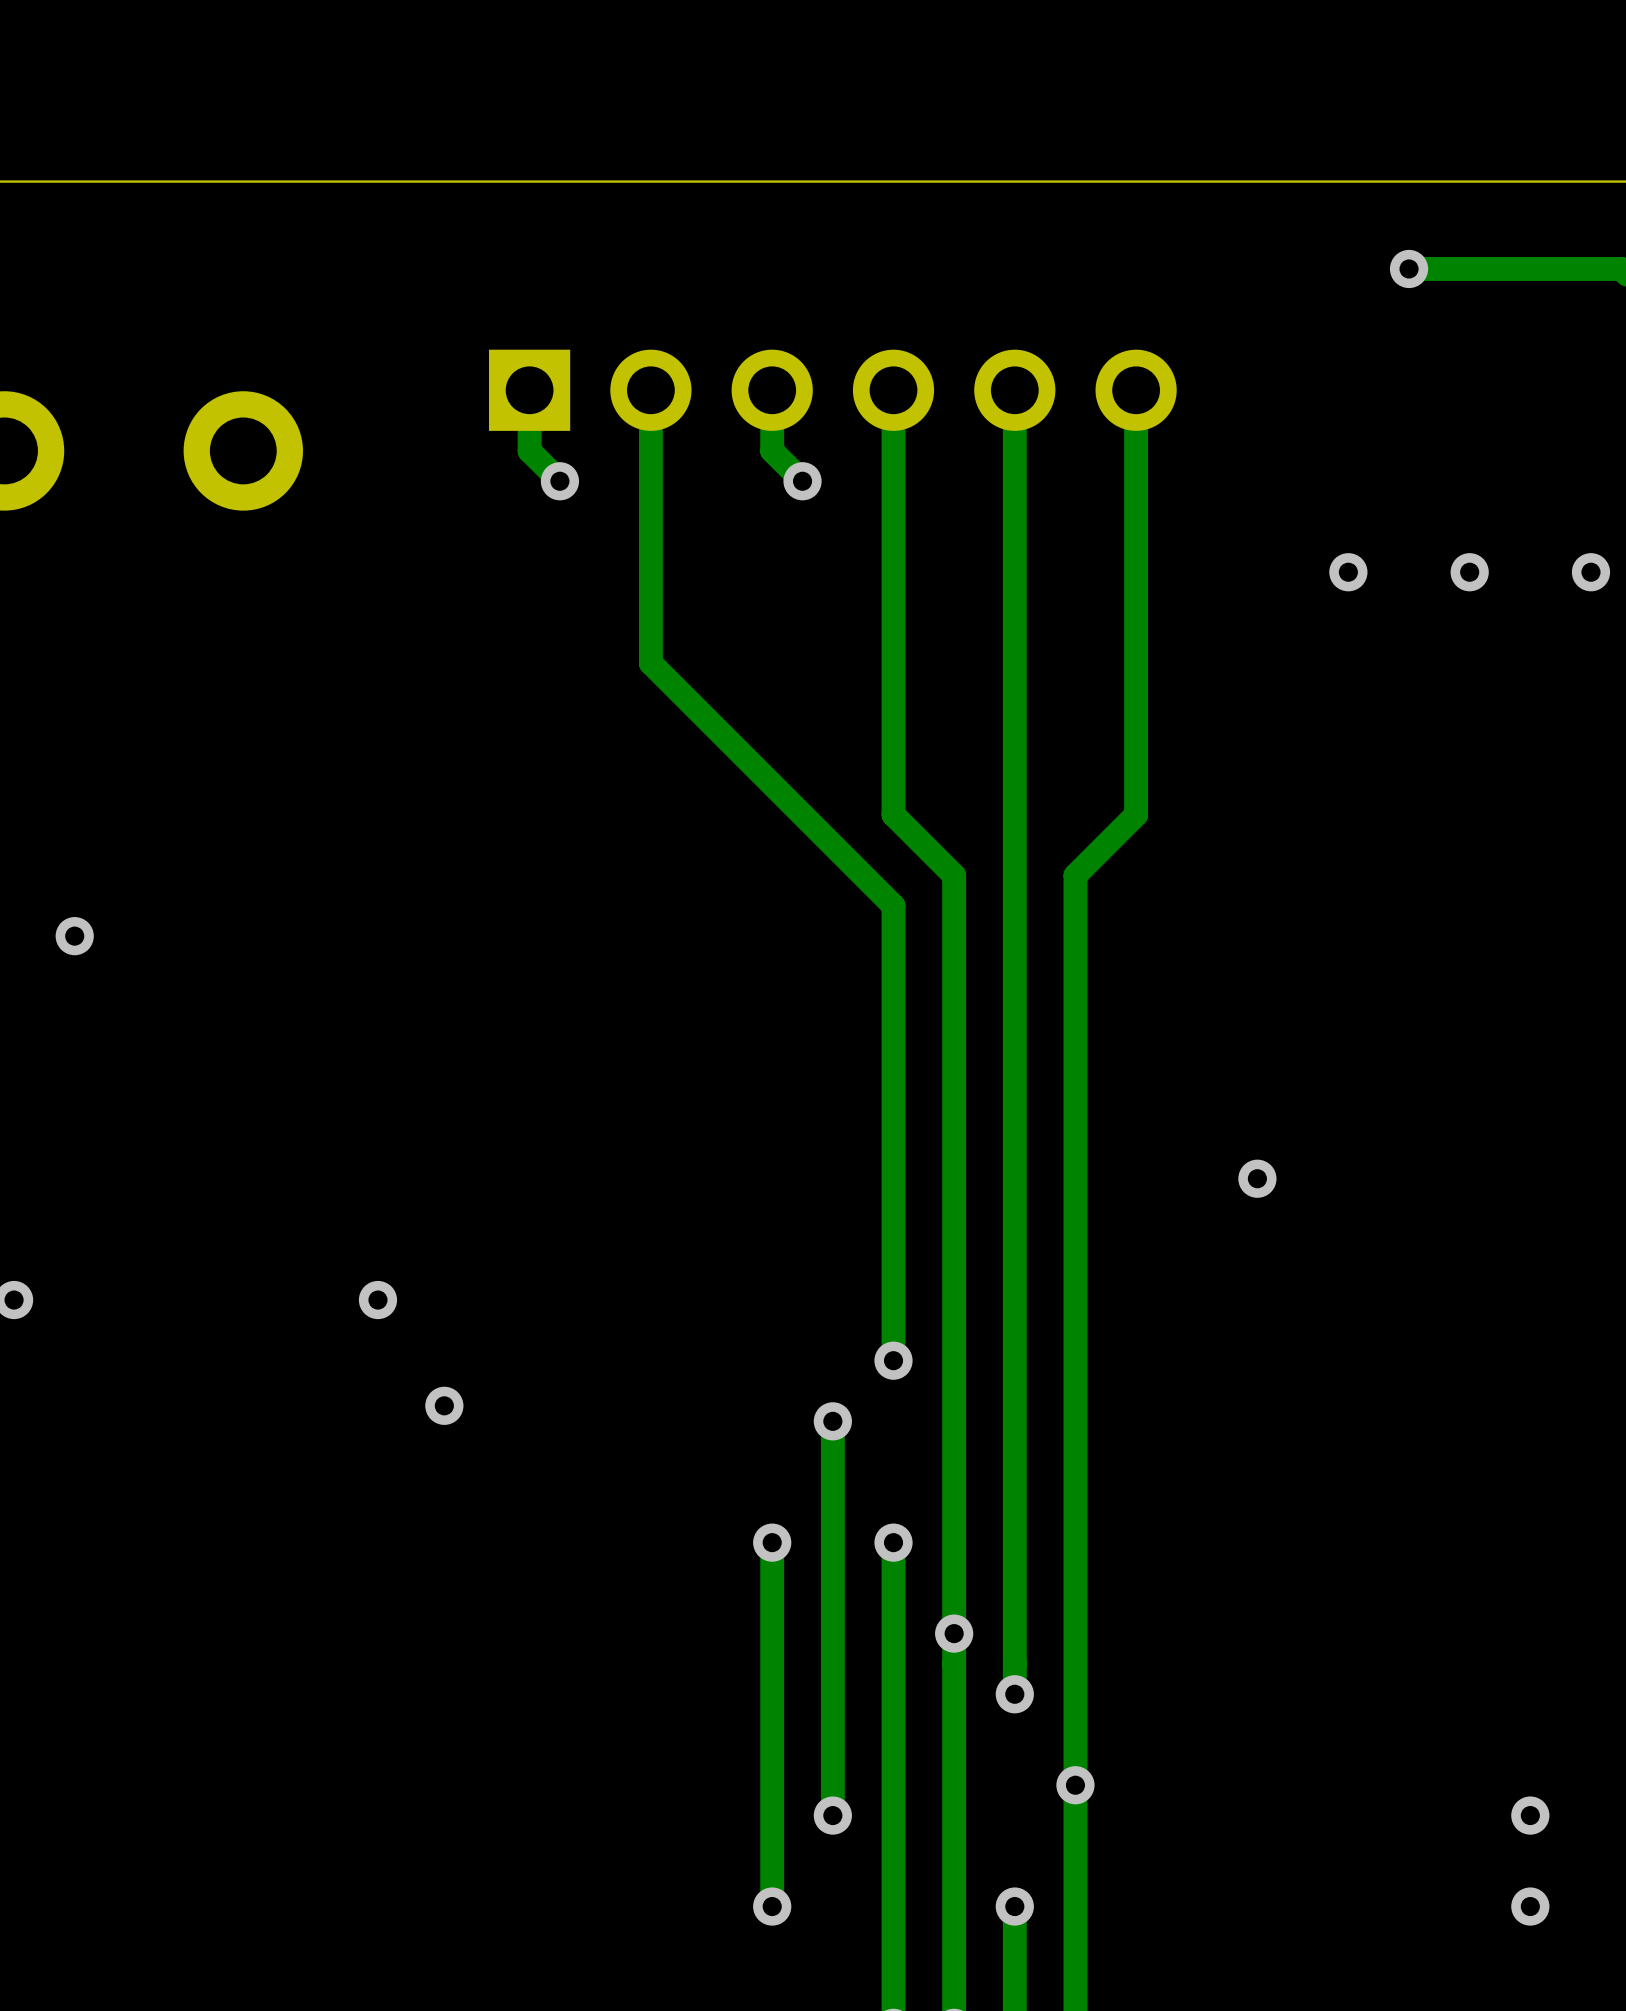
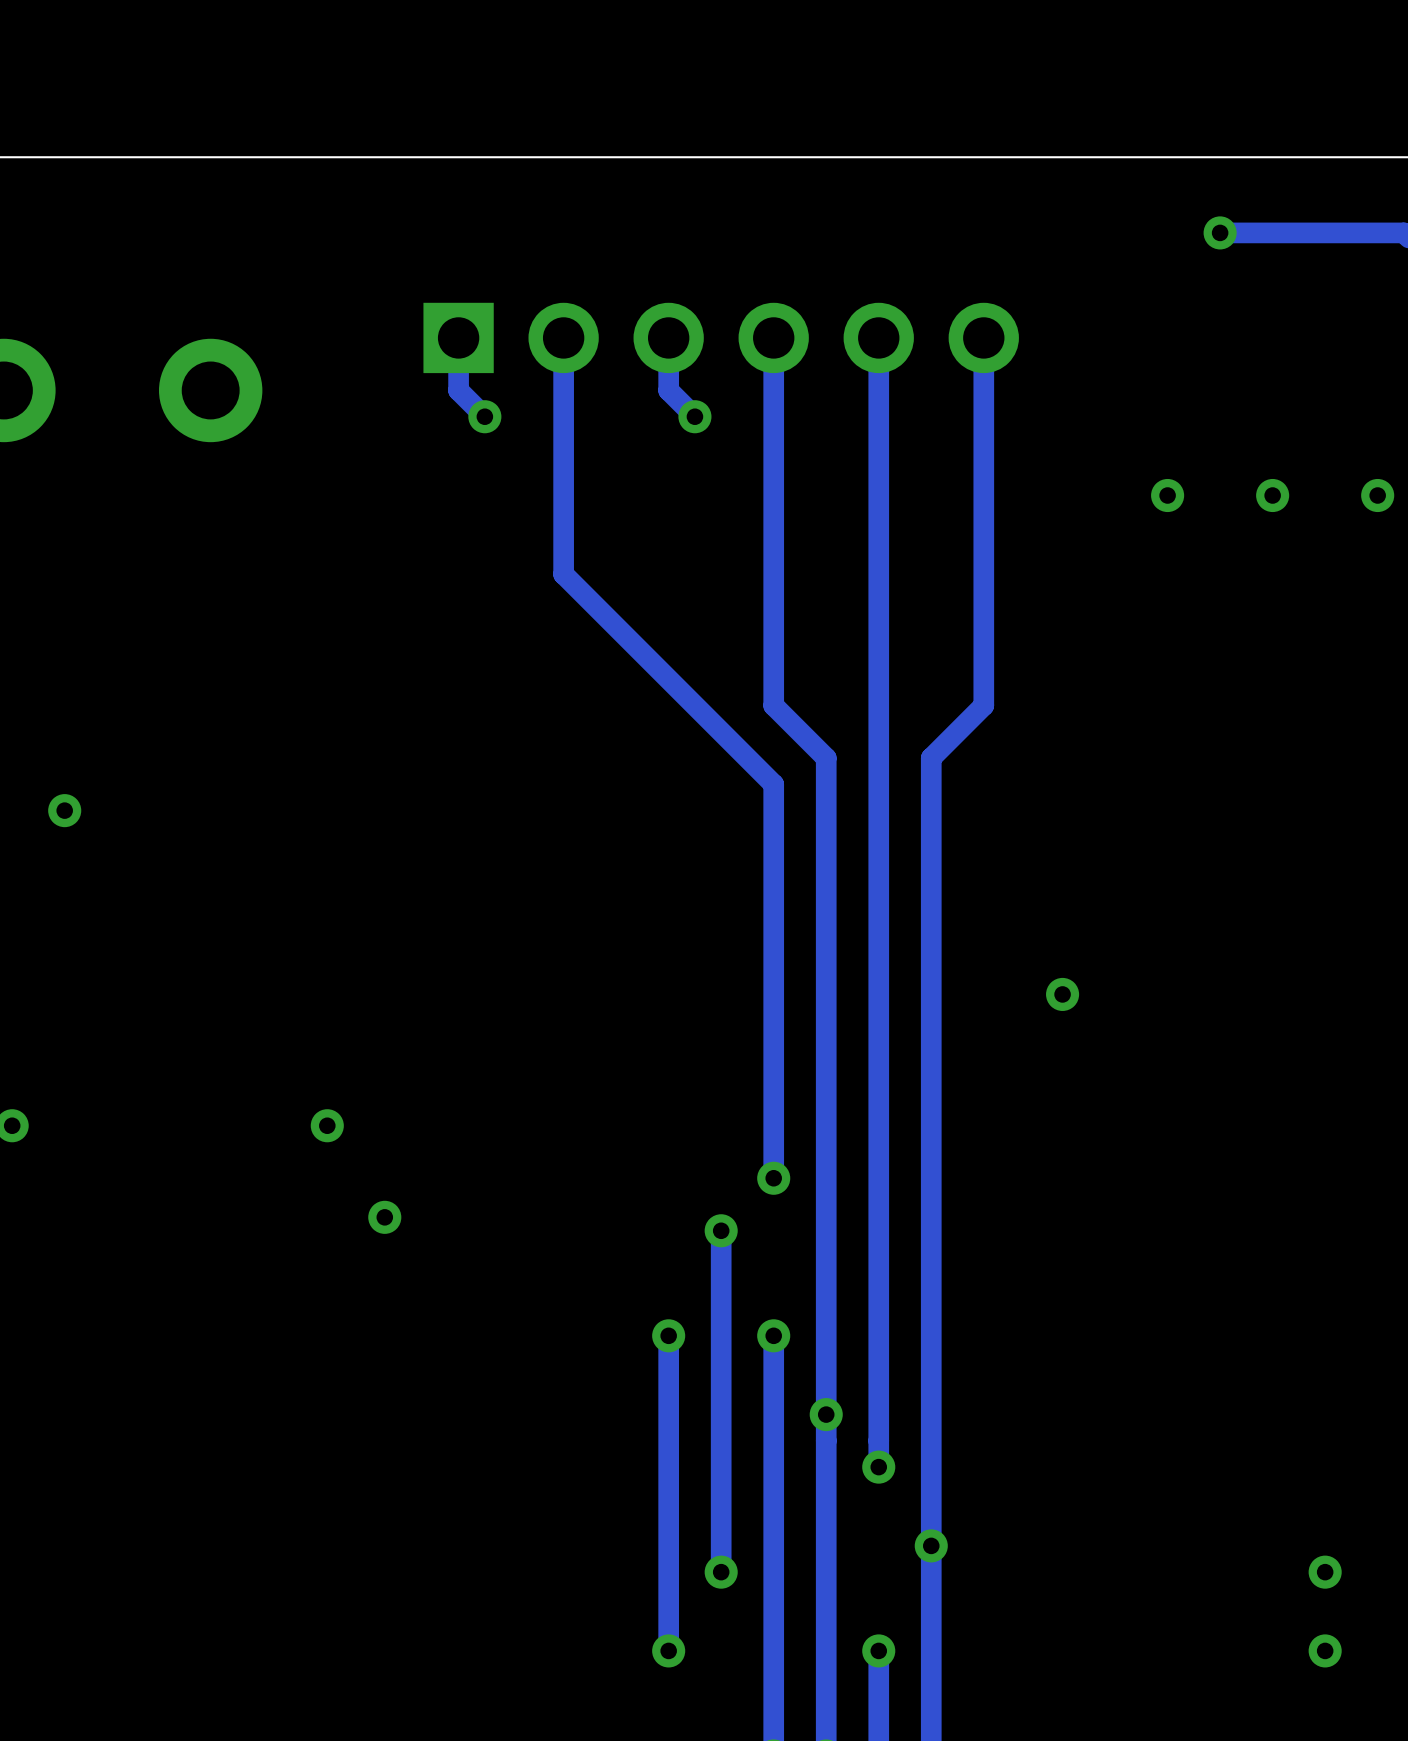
via position: (1257, 1178) -> (1062, 994)

